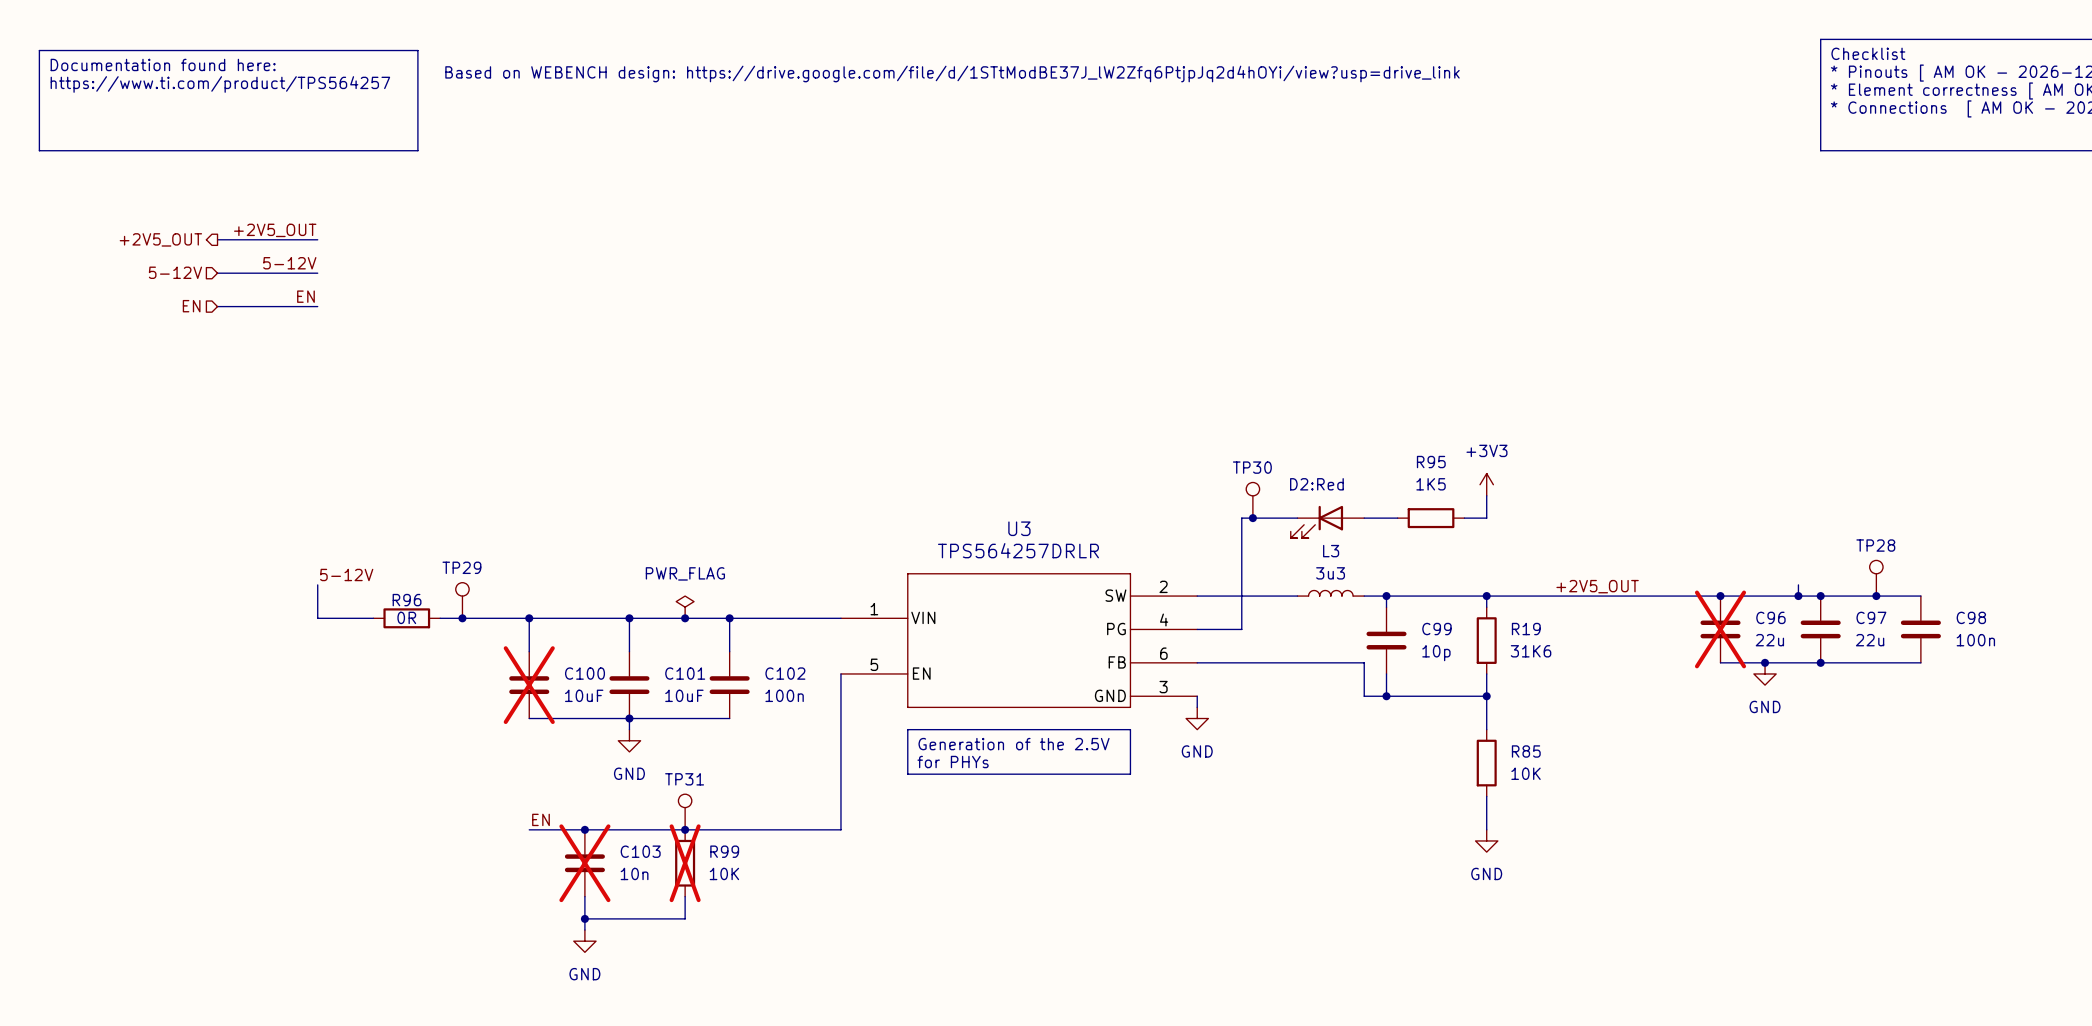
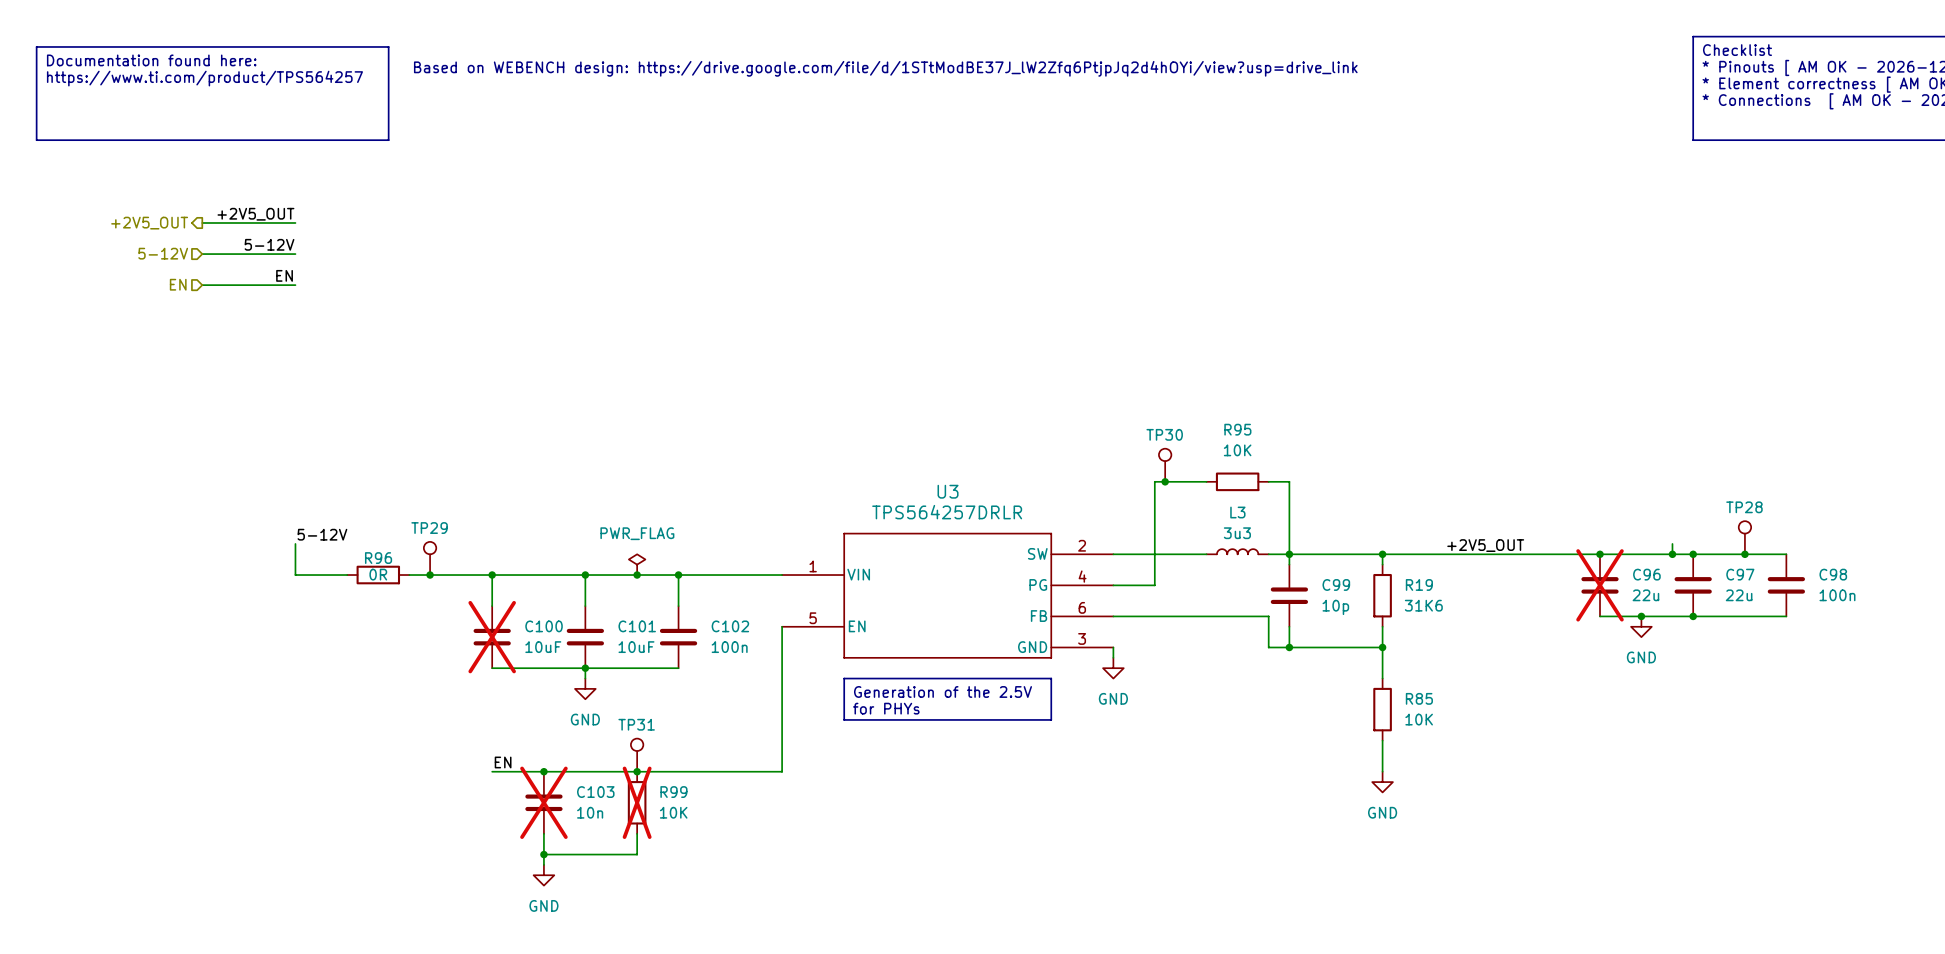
R95 value: 1K5 (1431, 484) -> 10K (1237, 450)
power symbol: +3V3 (1486, 484) -> none
wire: (1486, 495) (1486, 518) (1464, 518) -> none
wire: (1386, 518) (1397, 518) -> (1289, 481) (1289, 554)
R95 position: (1431, 518) -> (1237, 481)
part: (1327, 522) -> none

